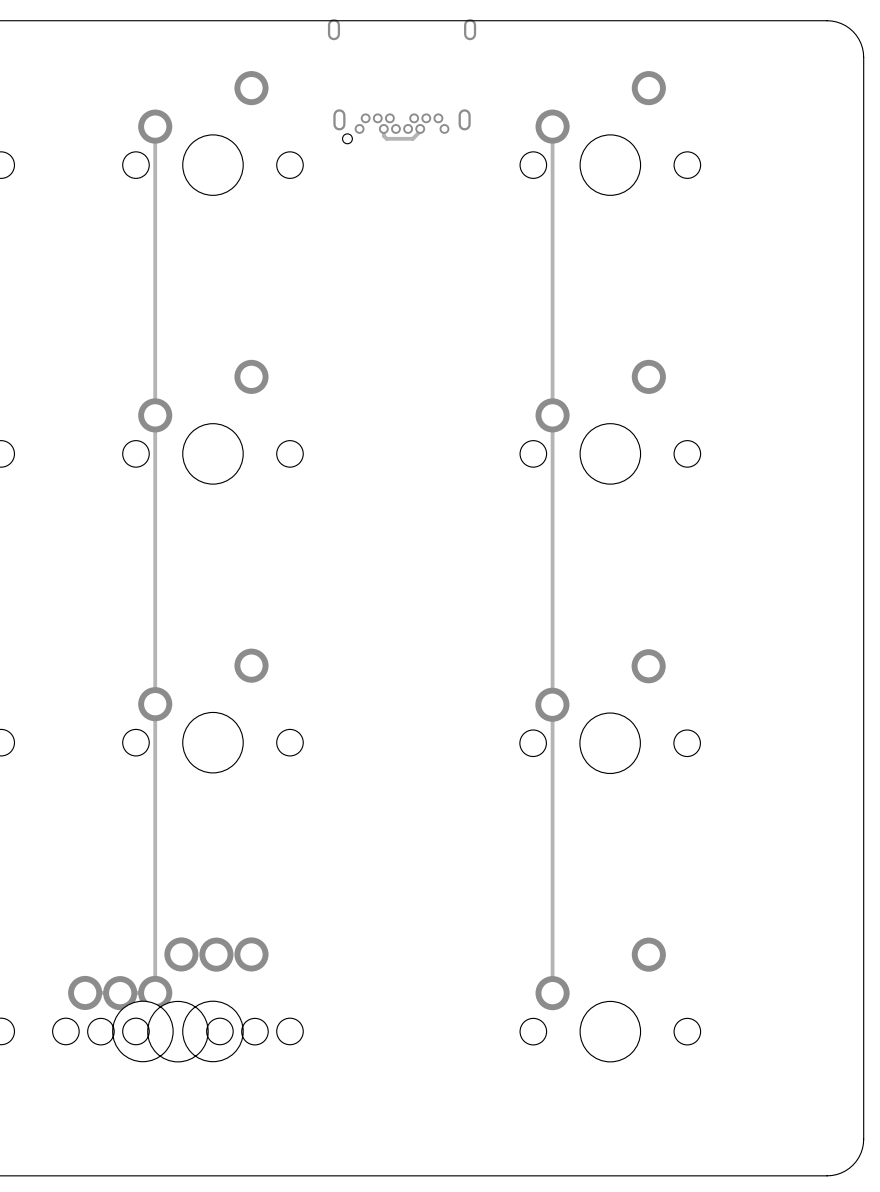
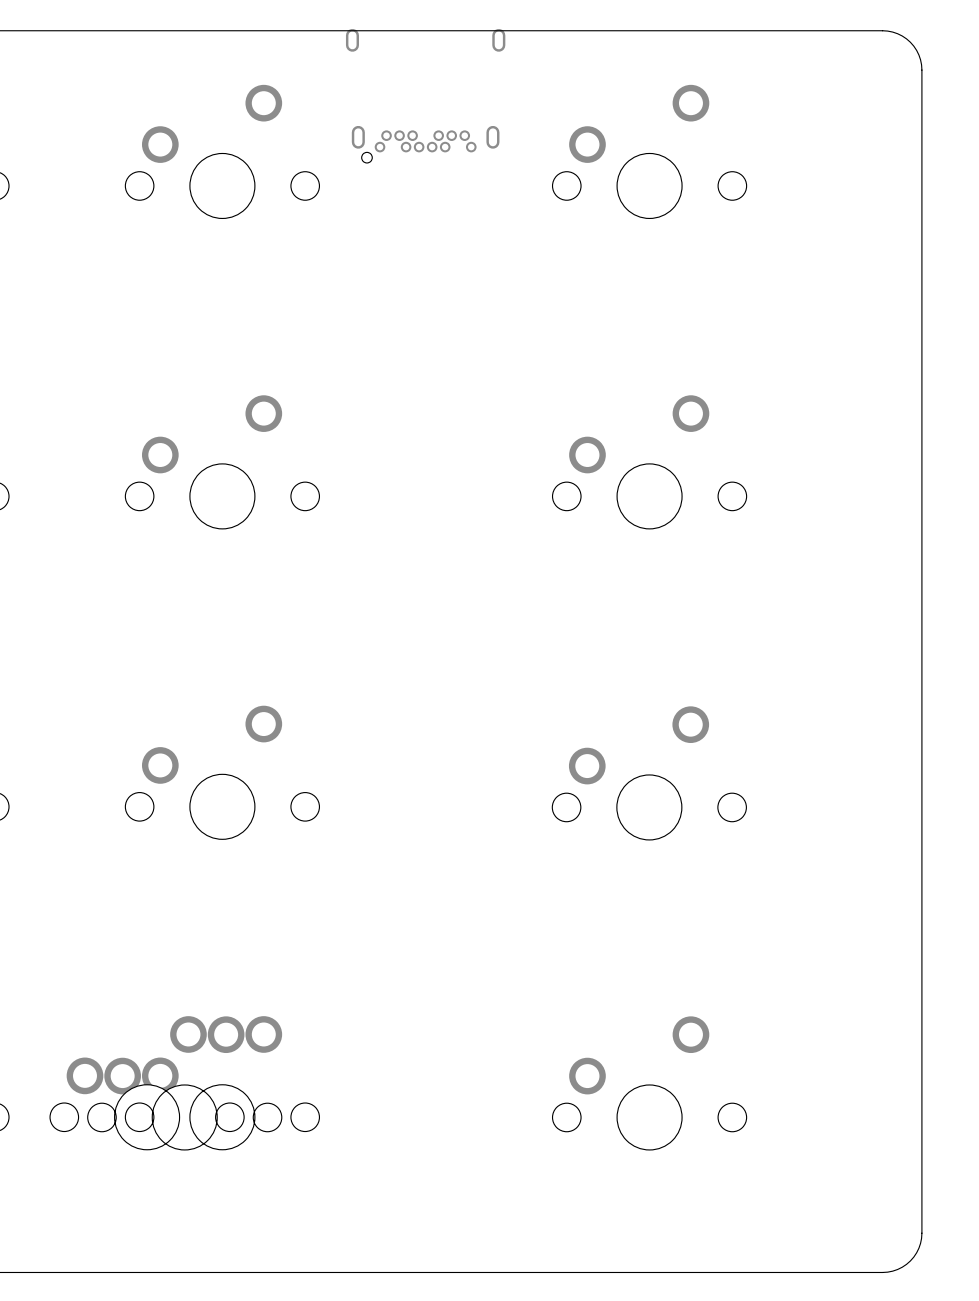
track: (155, 126) (155, 992) (85, 992) -> none
track: (552, 126) (552, 993) -> none
track: (383, 128) (383, 135) (386, 138) (412, 138) (420, 128) -> none

